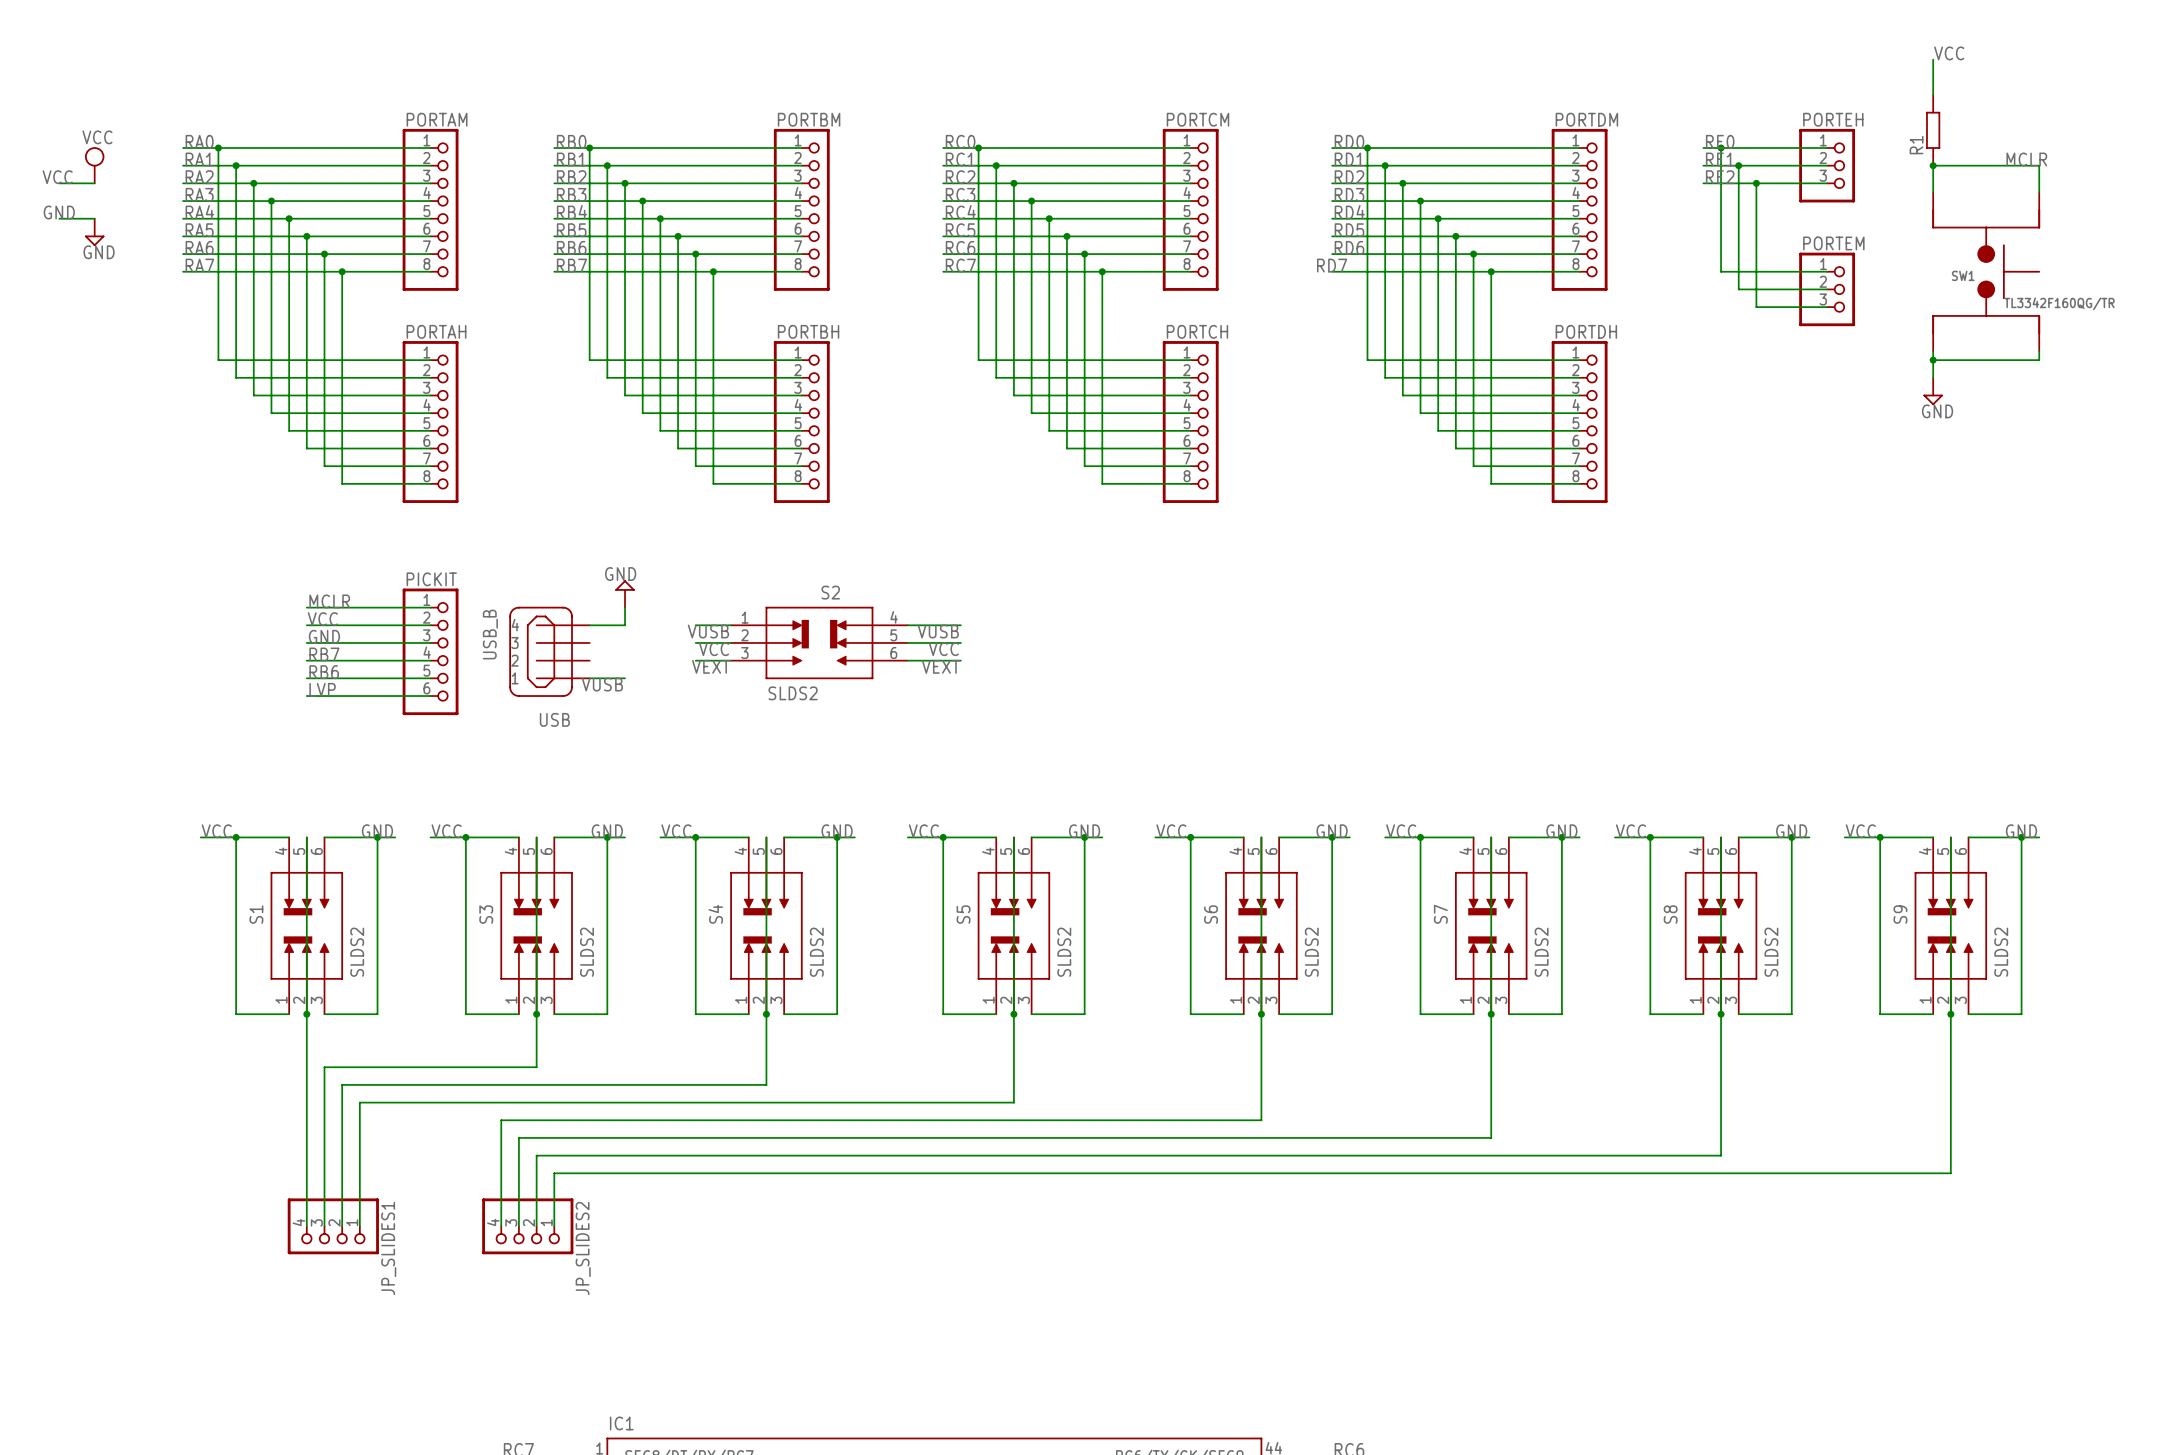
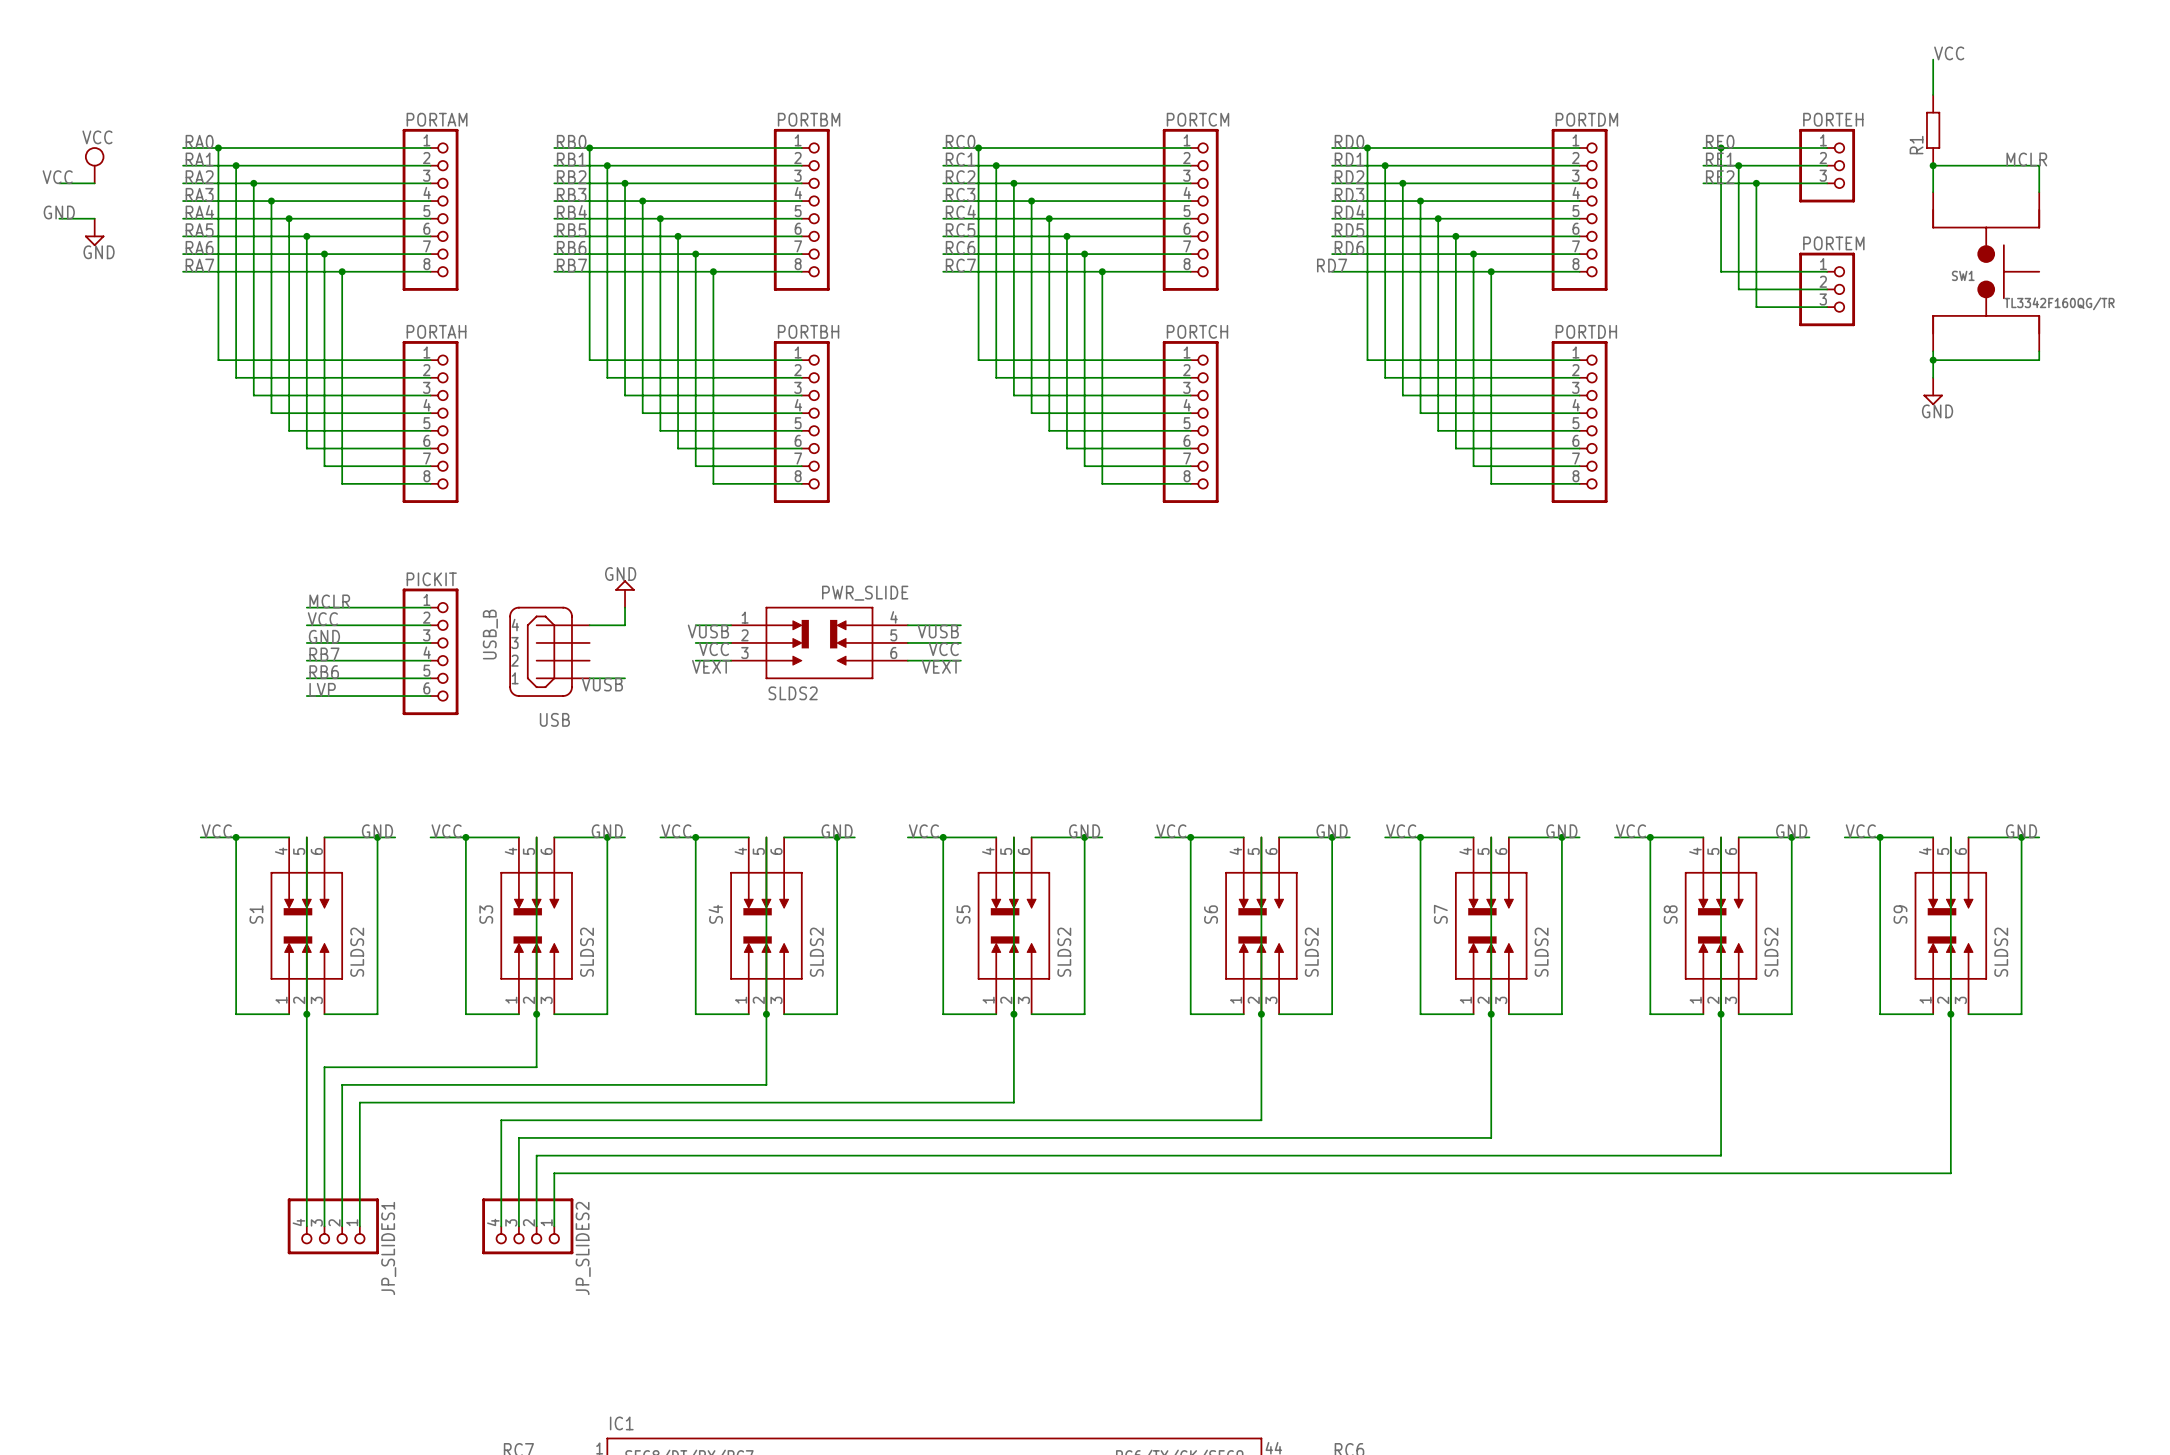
S2 name: S2 (830, 592) -> PWR_SLIDE (865, 593)

